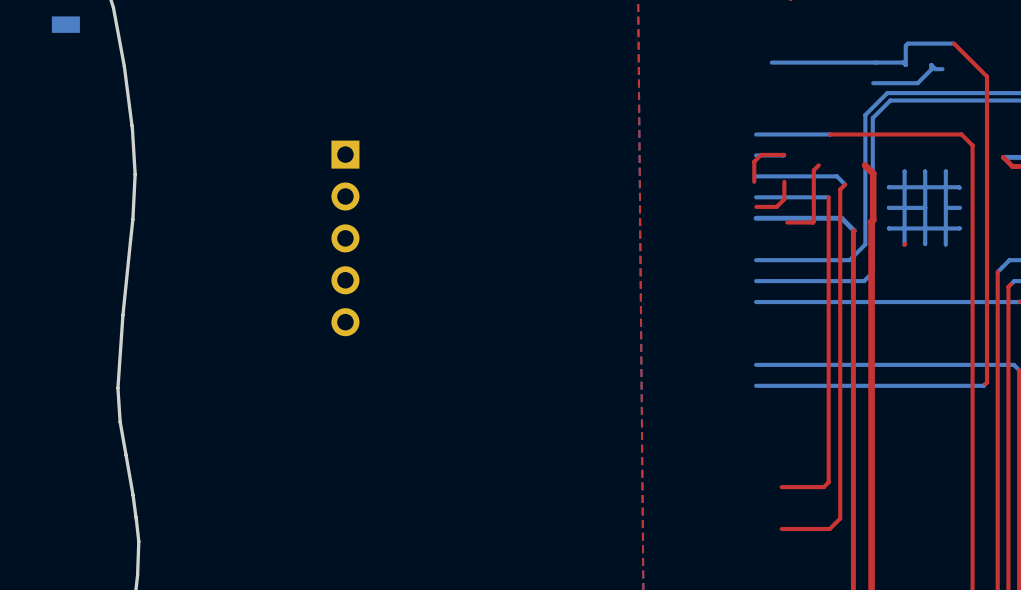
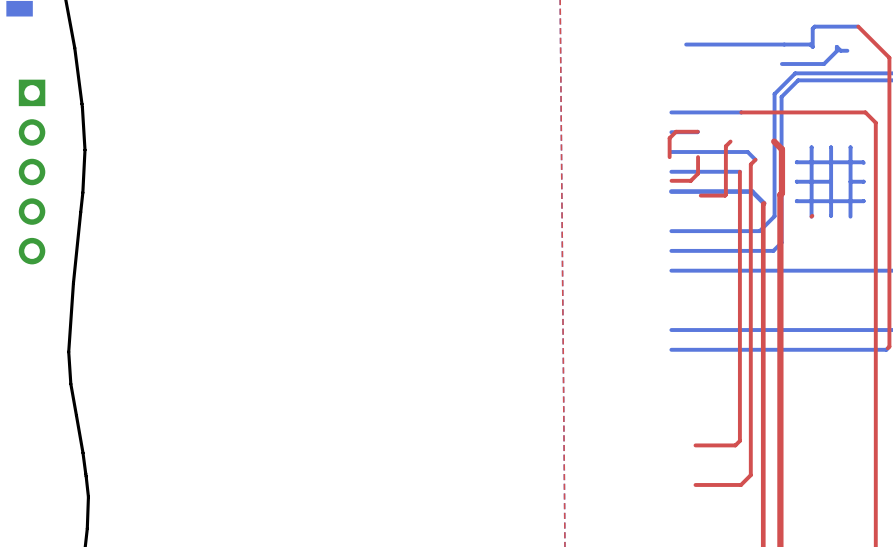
part position: (345, 238) -> (32, 172)

